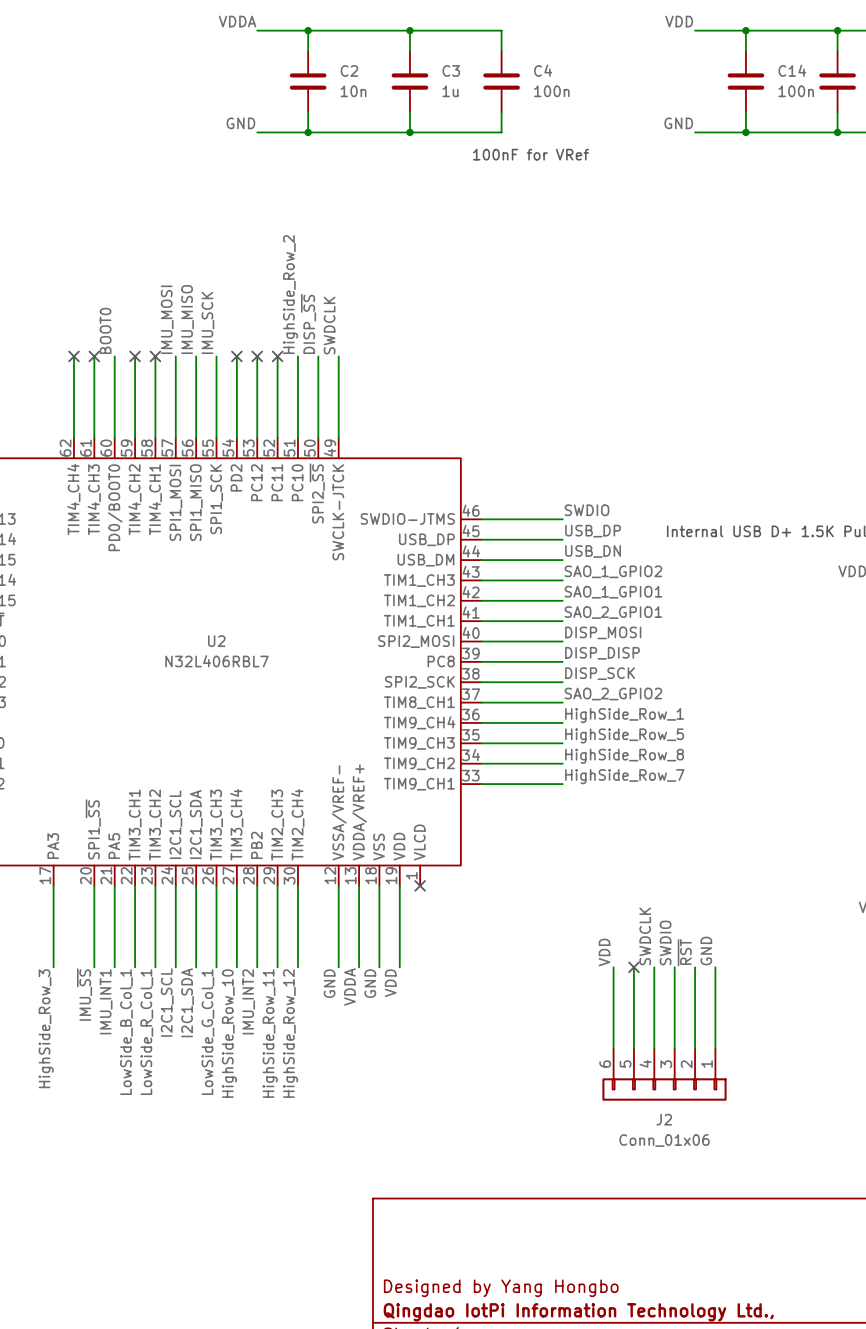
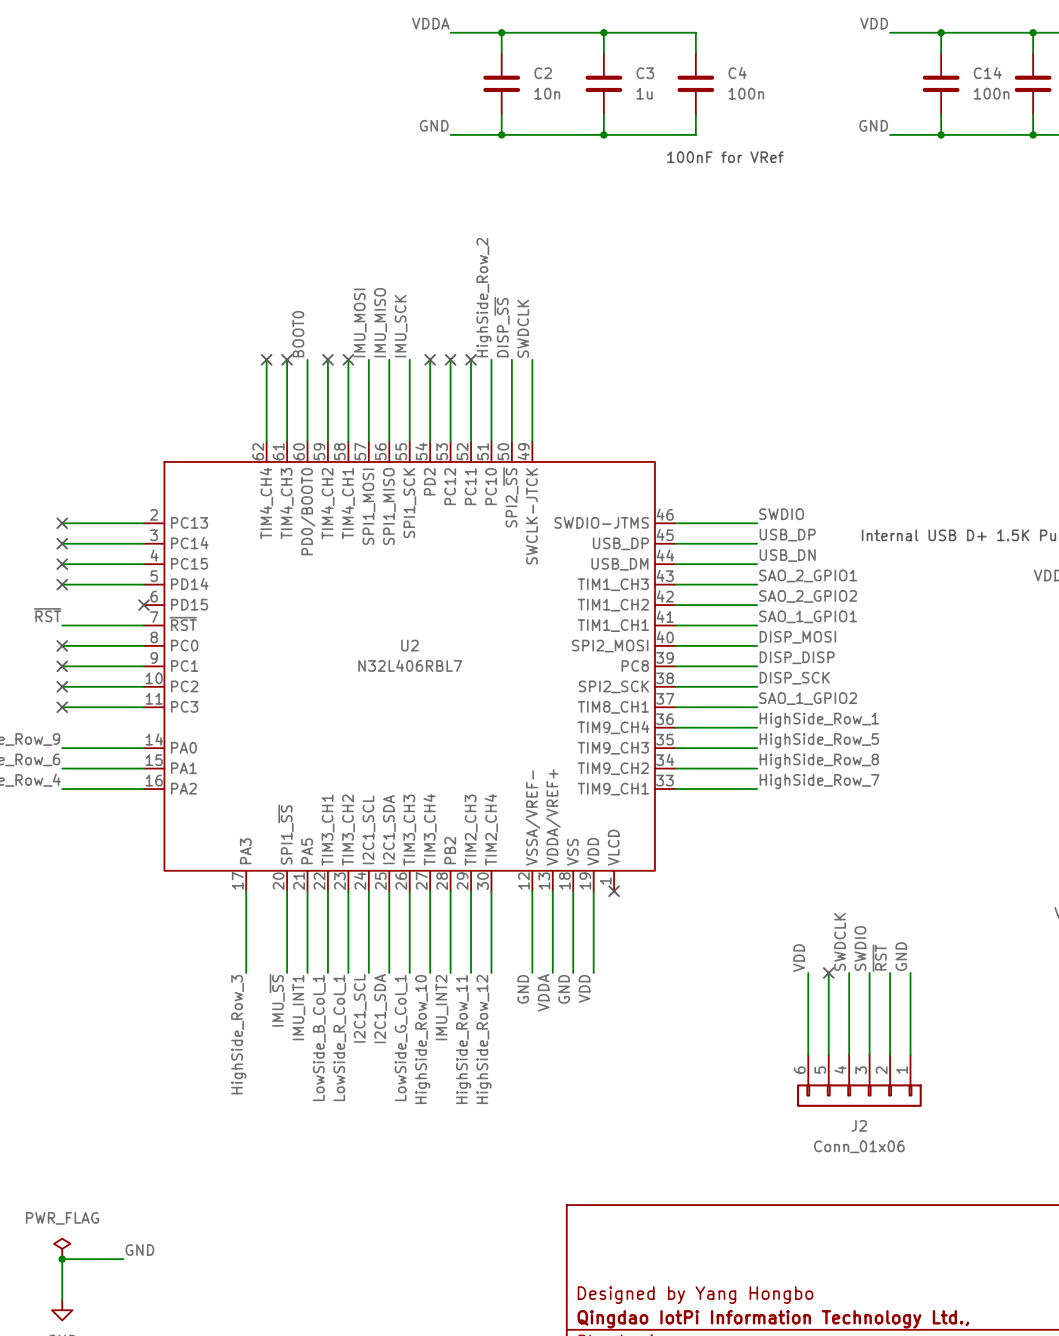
label: SAO_1_GPIO2 (613, 571) -> SAO_2_GPIO1 (808, 575)
label: SAO_1_GPIO1 (613, 592) -> SAO_2_GPIO2 (808, 596)
label: SAO_2_GPIO1 (613, 612) -> SAO_1_GPIO1 (808, 616)
label: SAO_2_GPIO2 (613, 694) -> SAO_1_GPIO2 (808, 698)

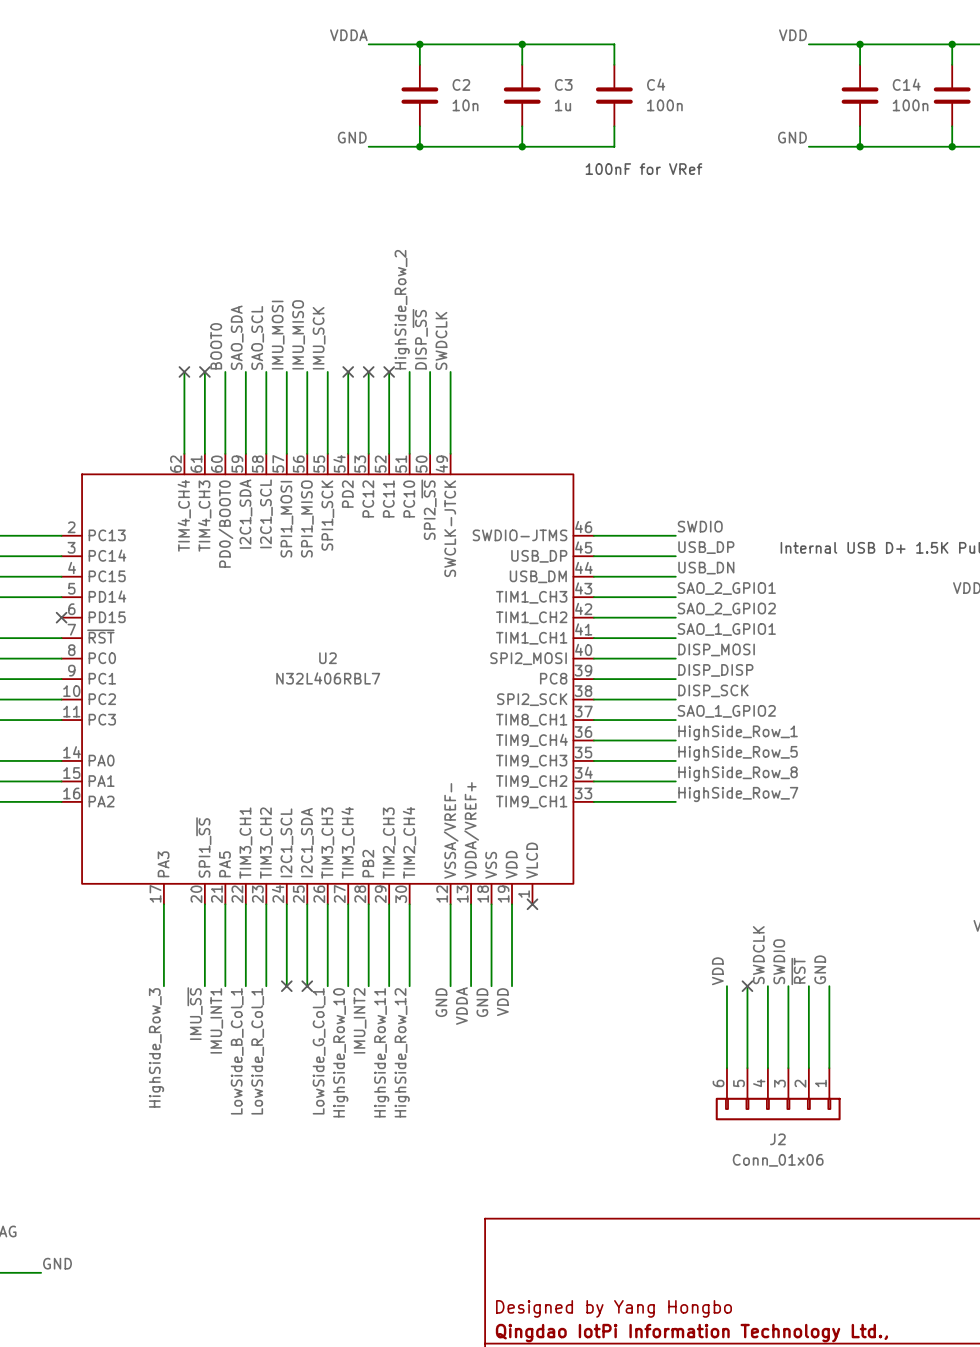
label: none -> SAO_SDA (237, 337)
label: none -> SAO_SCL (257, 338)
no-connect mark: (327, 359) -> none
no-connect mark: (348, 359) -> none
U2 pin name: TIM4_CH2 (327, 503) -> I2C1_SDA (245, 514)
U2 pin name: TIM4_CH1 (348, 503) -> I2C1_SCL (266, 513)
no-connect mark: none -> (286, 986)
no-connect mark: none -> (307, 986)
label: I2C1_SCL (360, 1008) -> none
label: I2C1_SDA (380, 1008) -> none

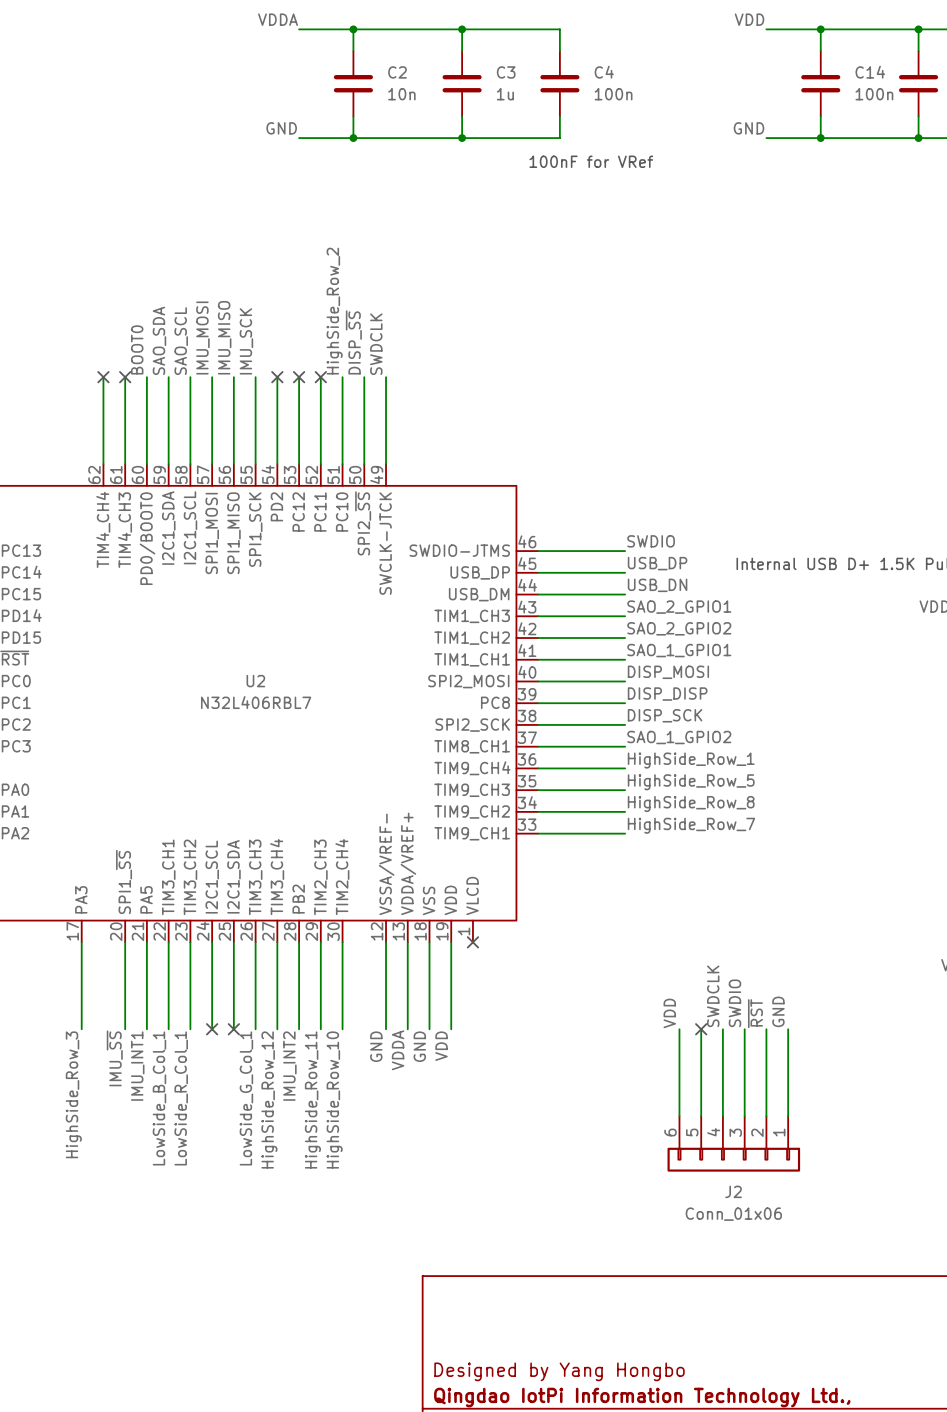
label: HighSide_Row_10 (340, 1052) -> HighSide_Row_12 (269, 1099)
label: HighSide_Row_12 (402, 1052) -> HighSide_Row_10 (334, 1099)

